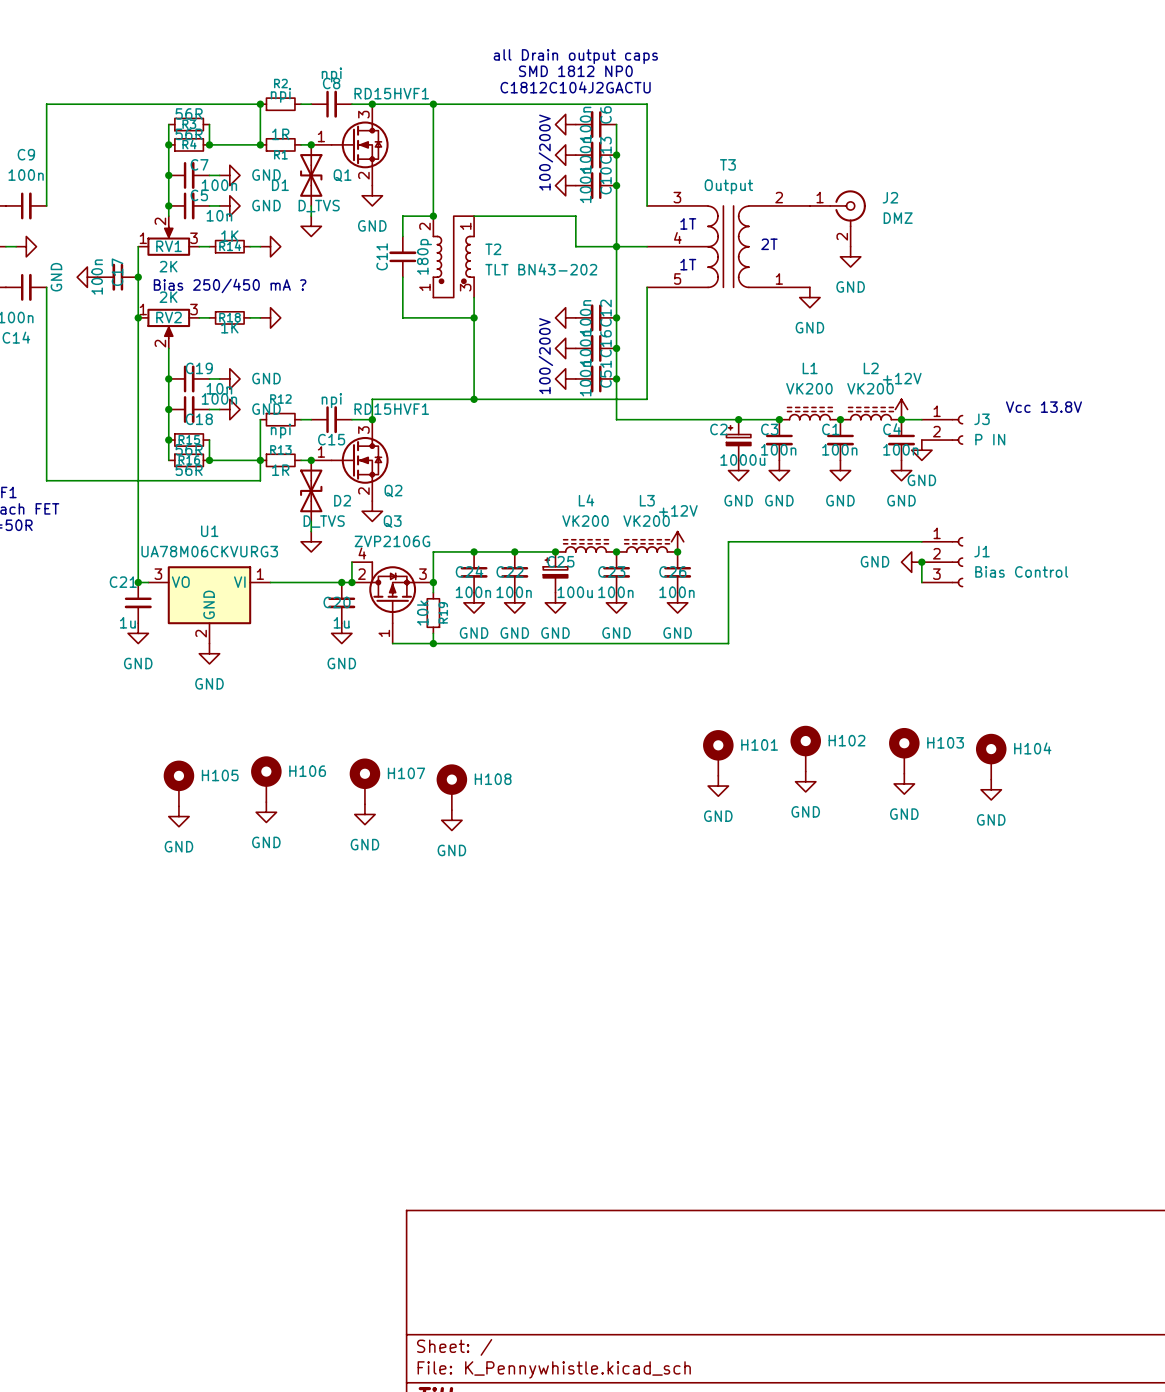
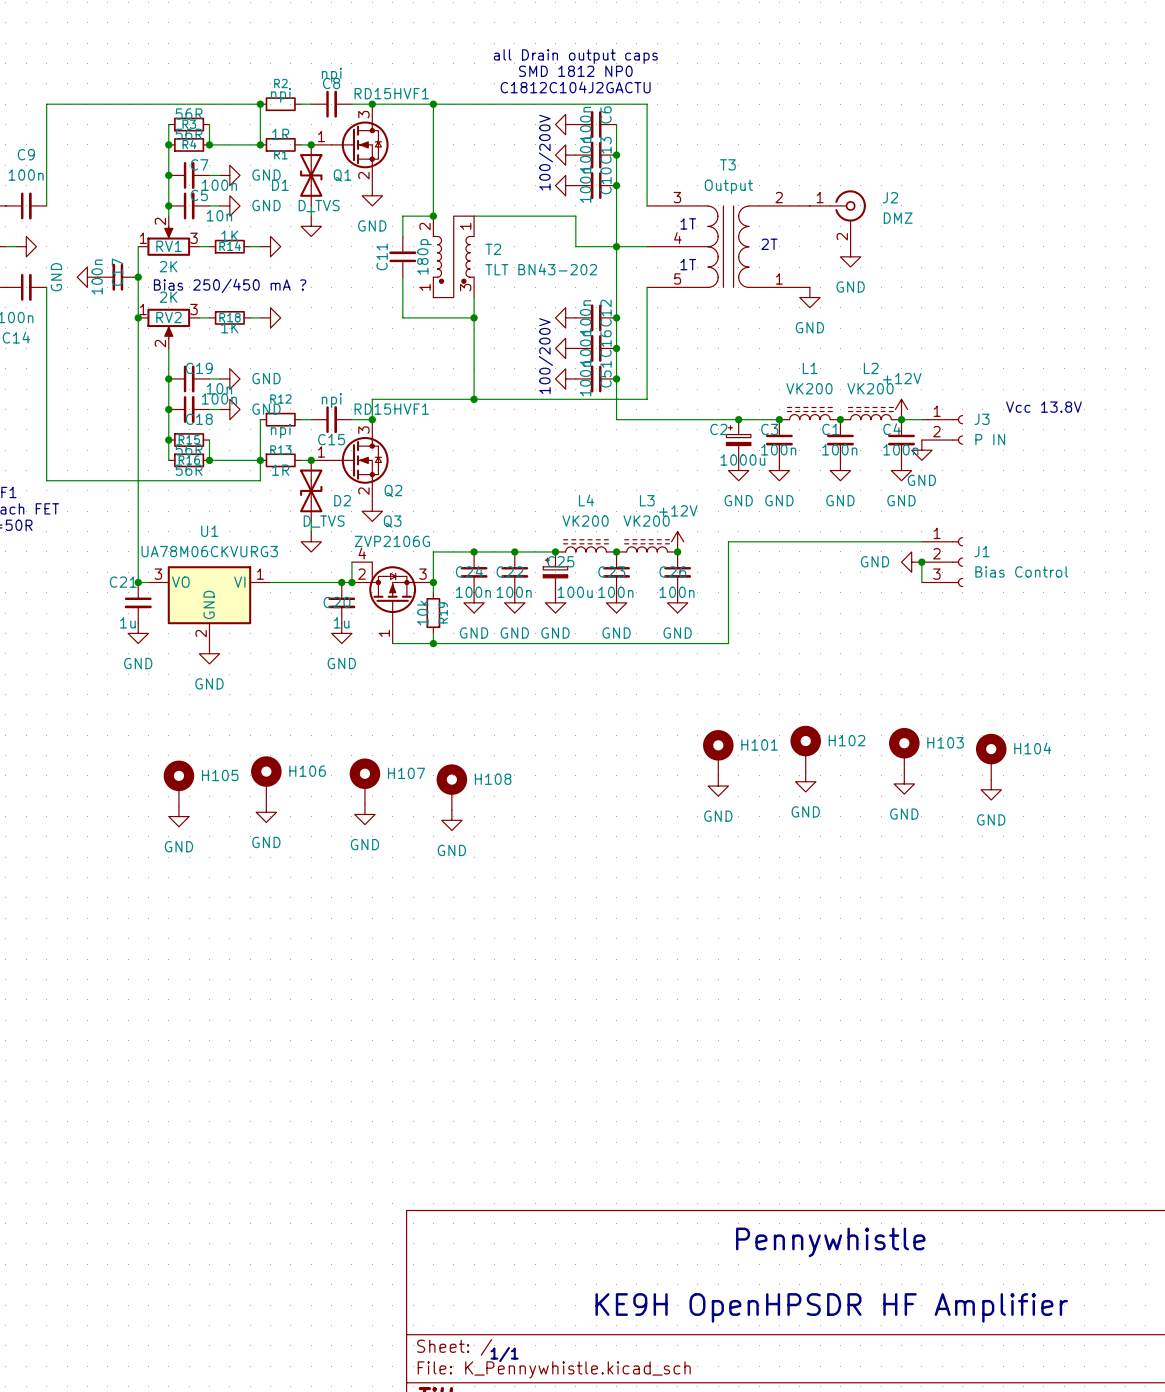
text: none -> Pennywhistle (830, 1242)
text: none -> KE9H OpenHPSDR HF Amplifier (831, 1307)
text: none -> 1/1 (504, 1354)

